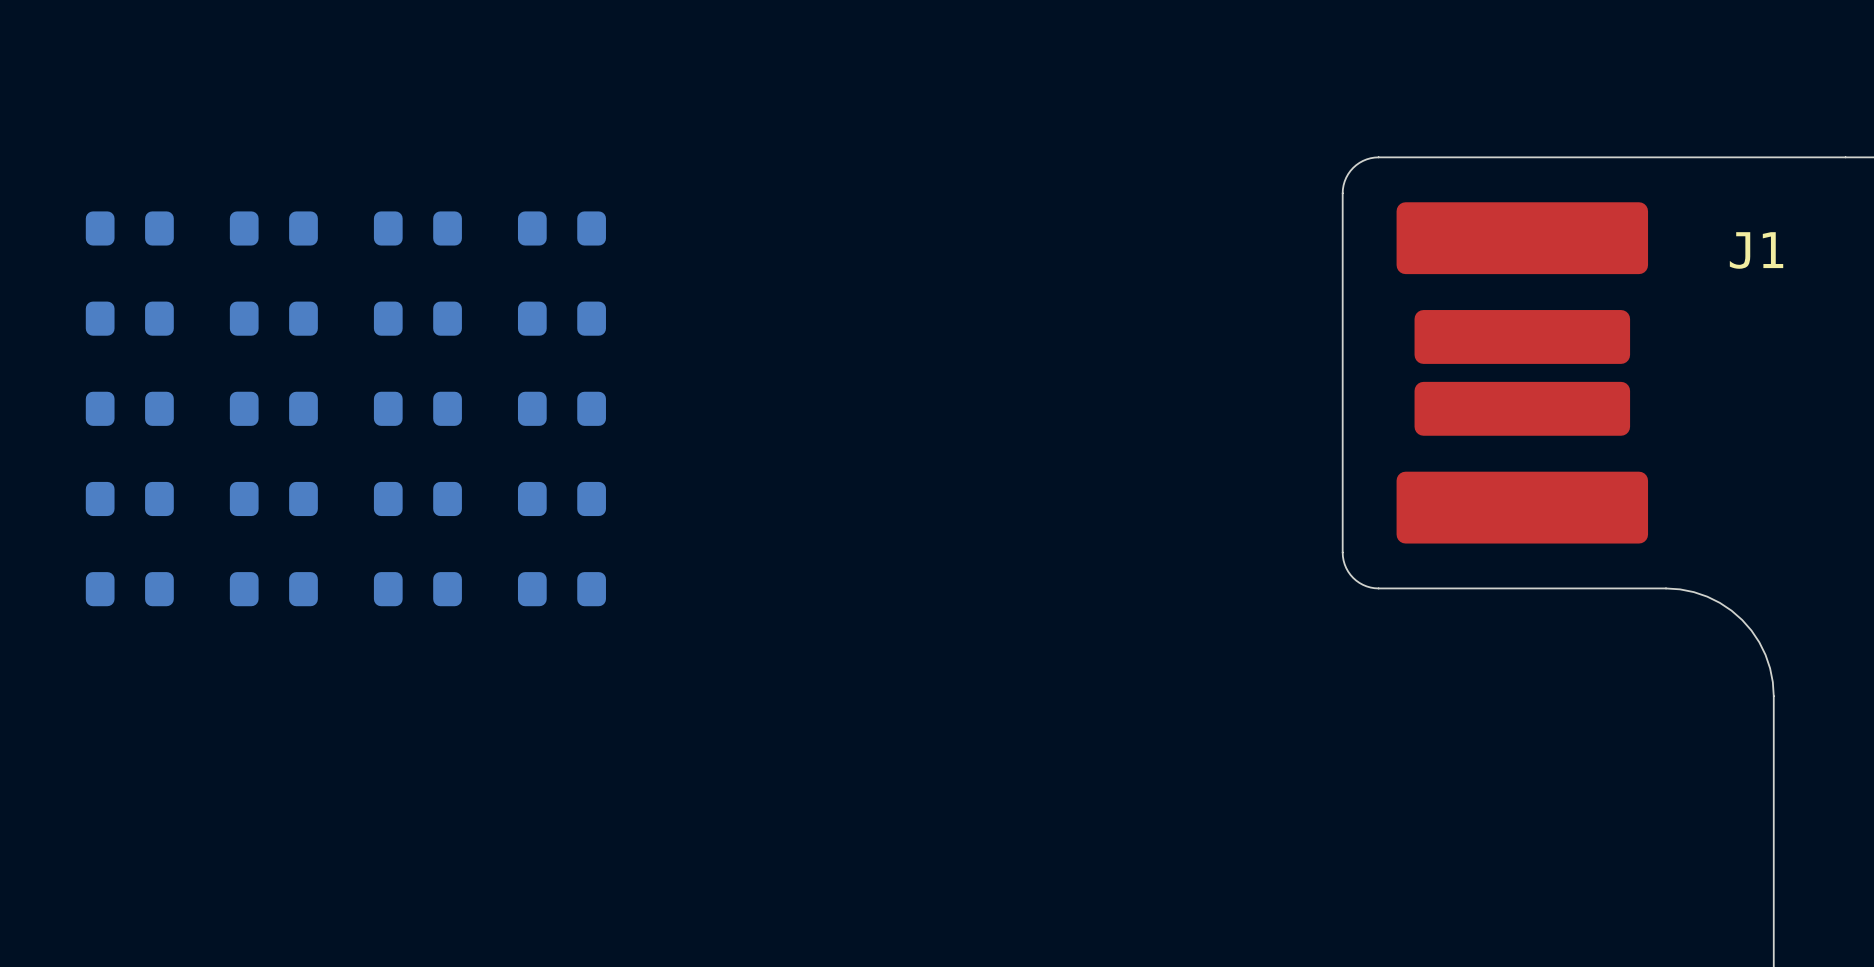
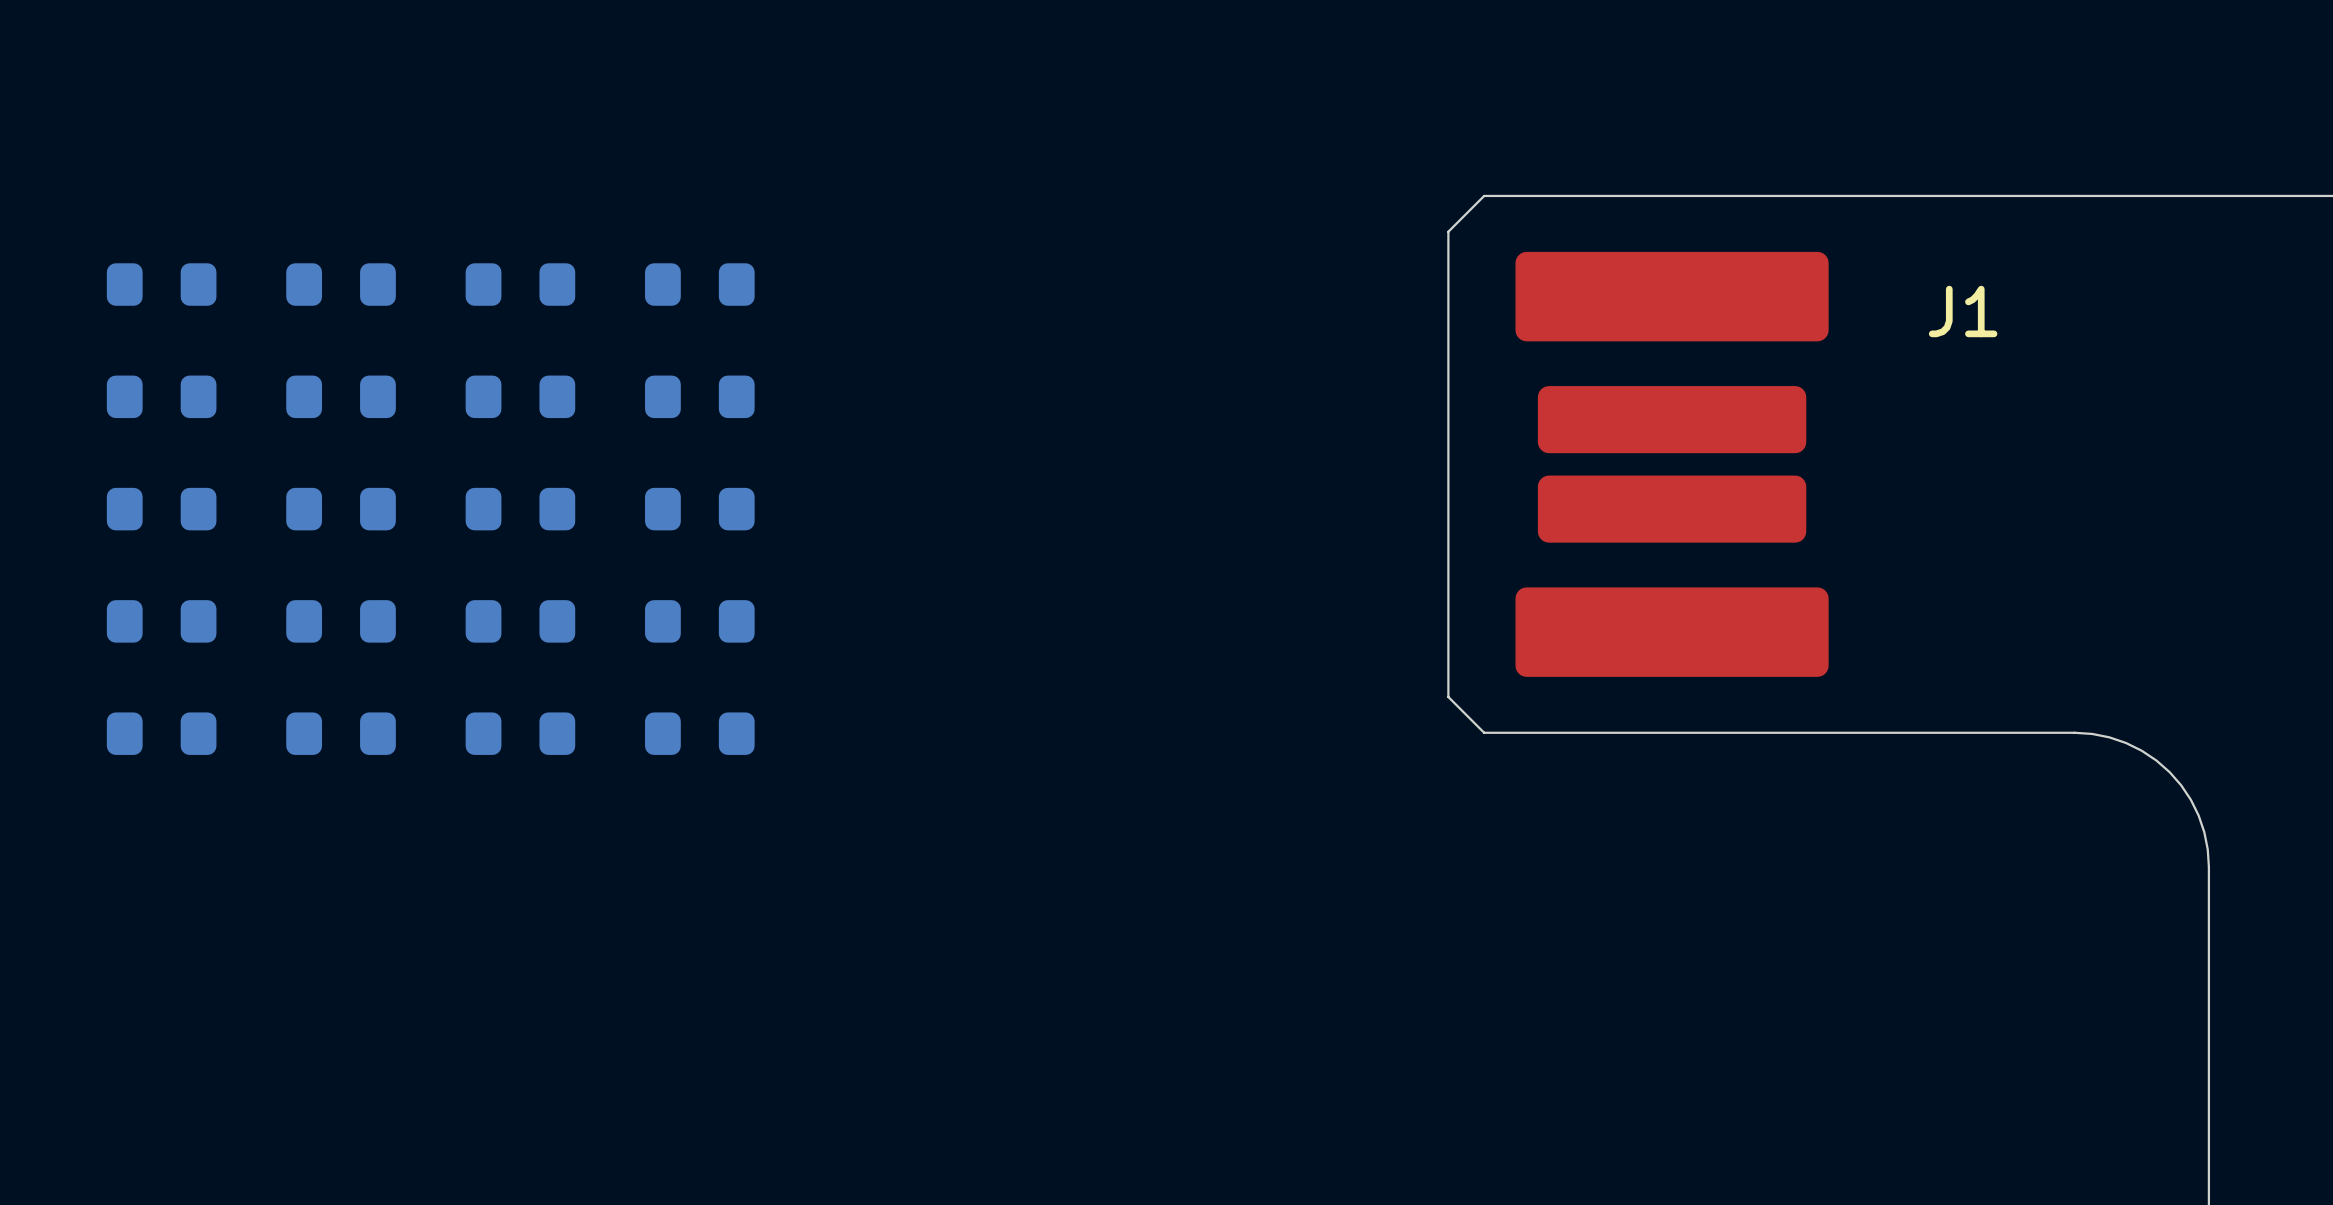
J1 footprint: [1341, 156, 1847, 590] -> [1447, 194, 2076, 734]

